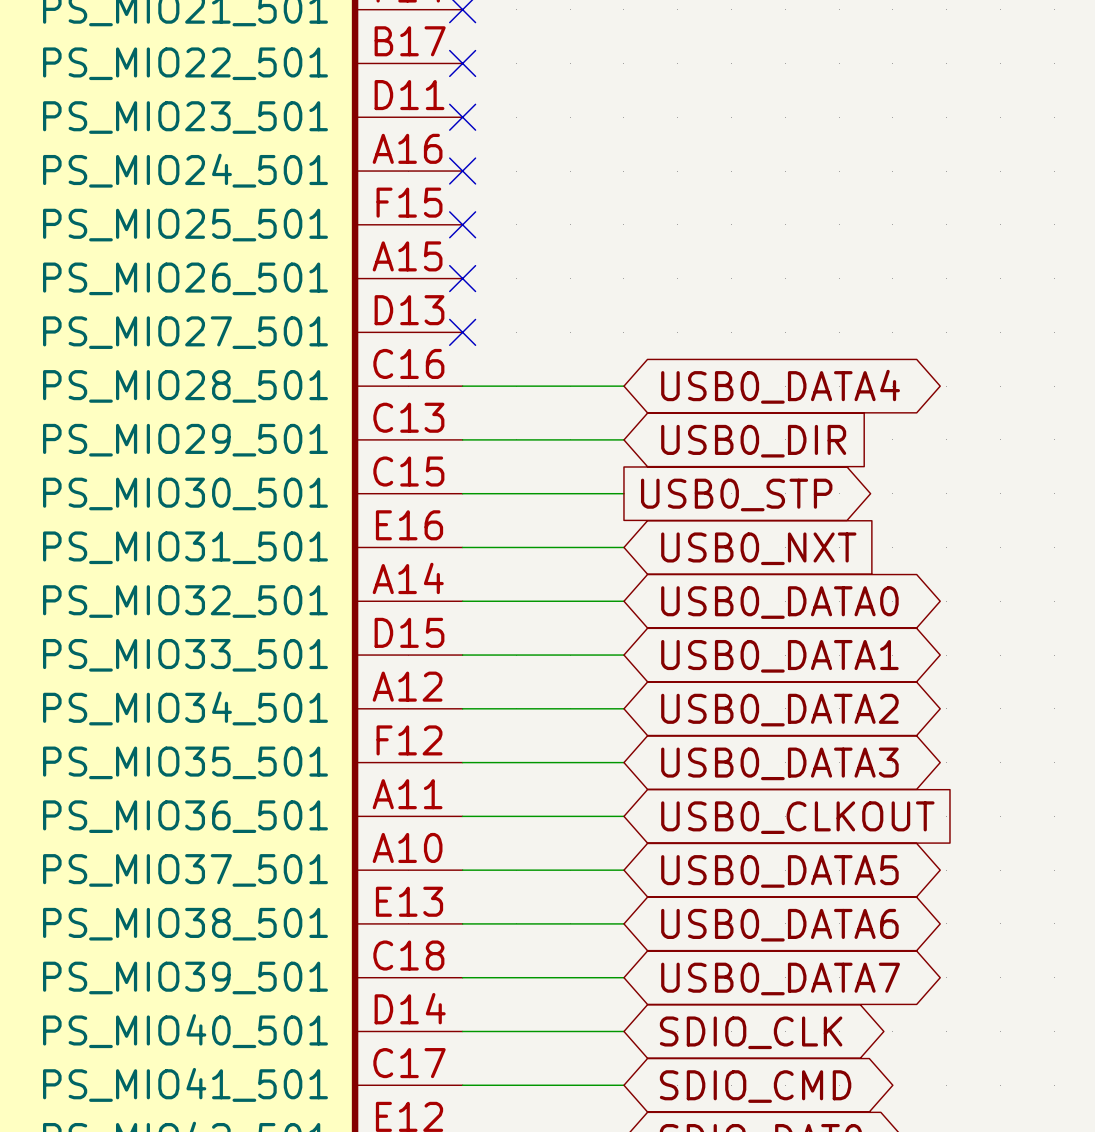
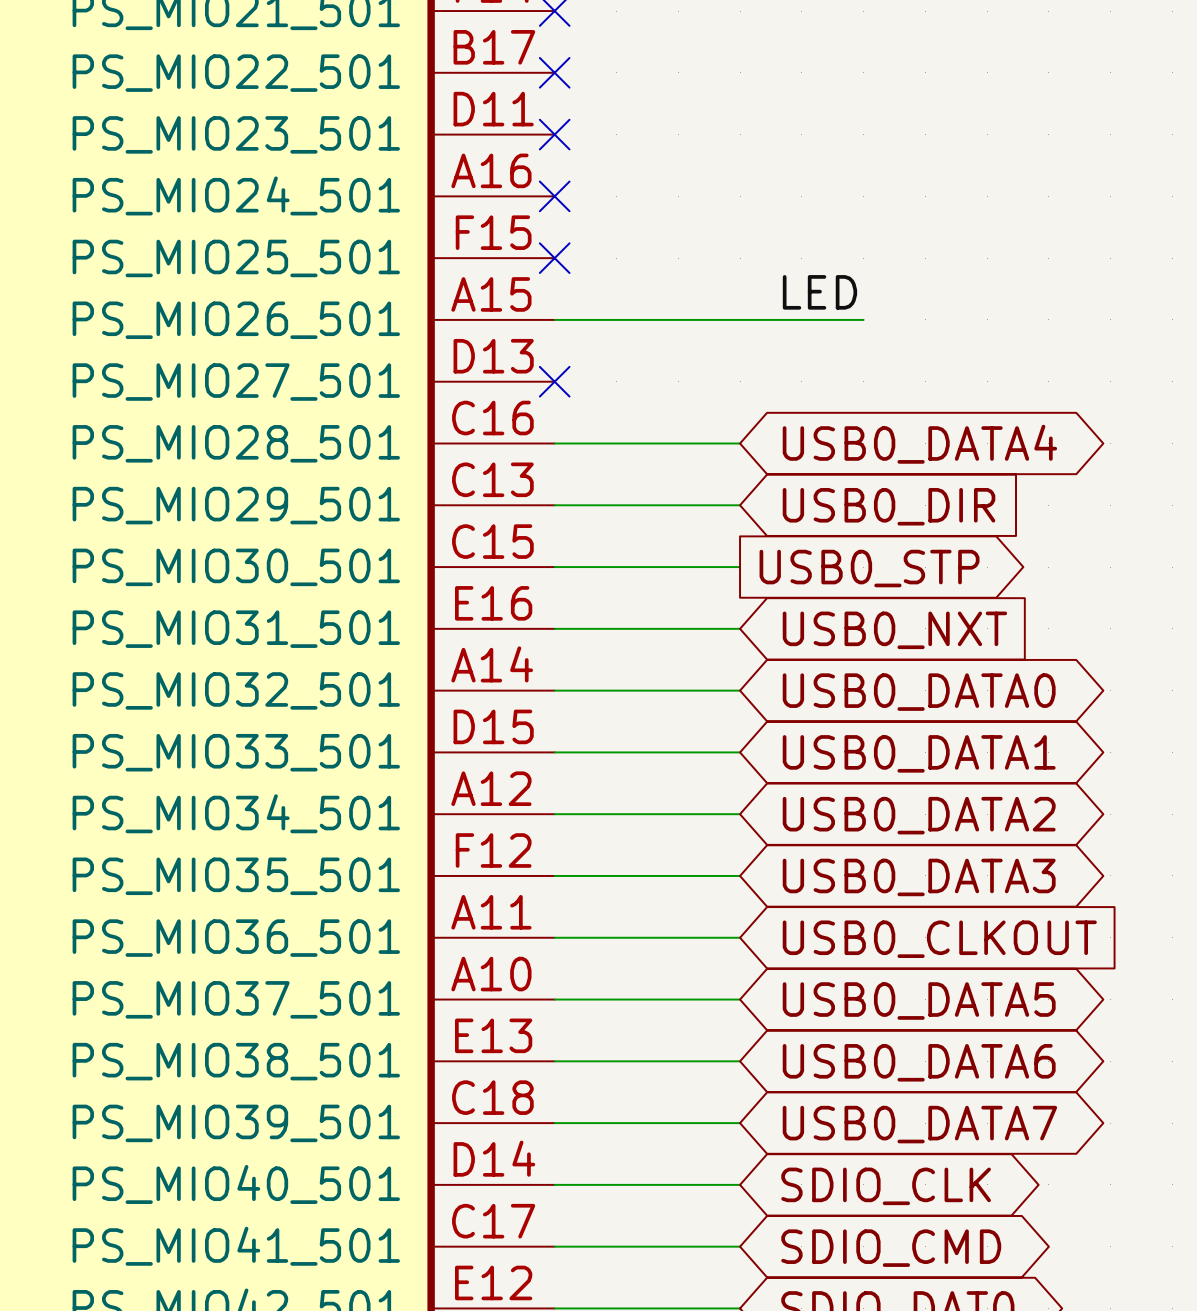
label: none -> LED (819, 292)
wire: none -> (554, 319) (863, 319)
no-connect mark: (462, 278) -> none

